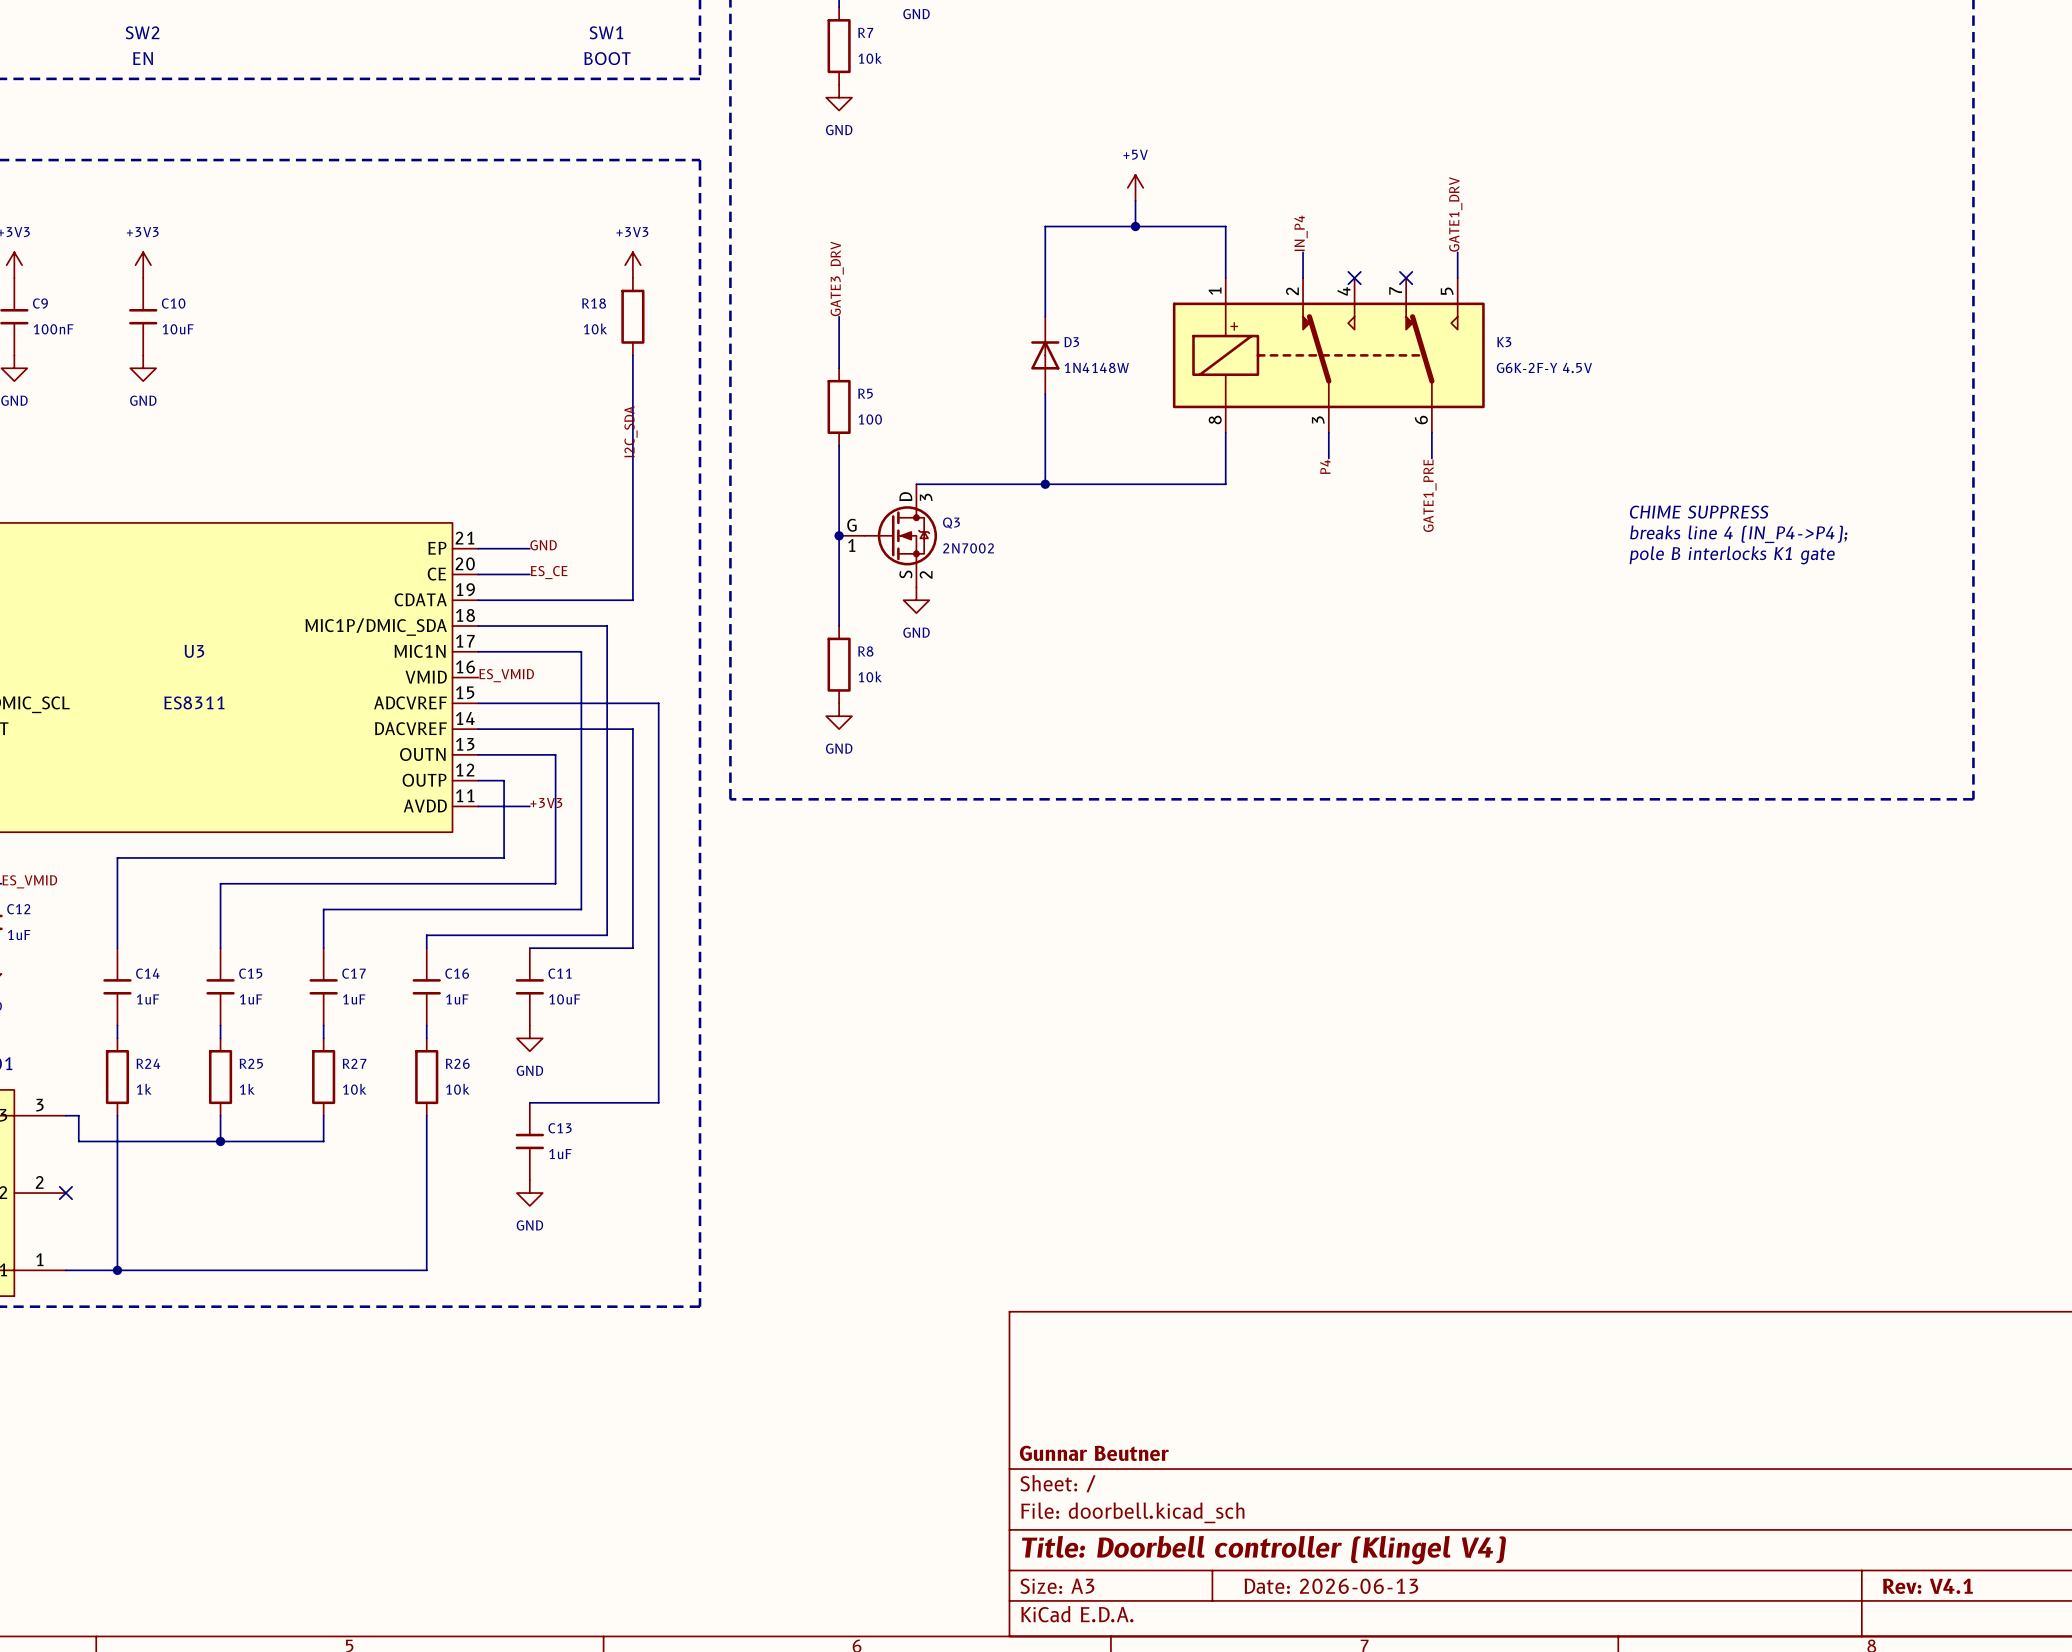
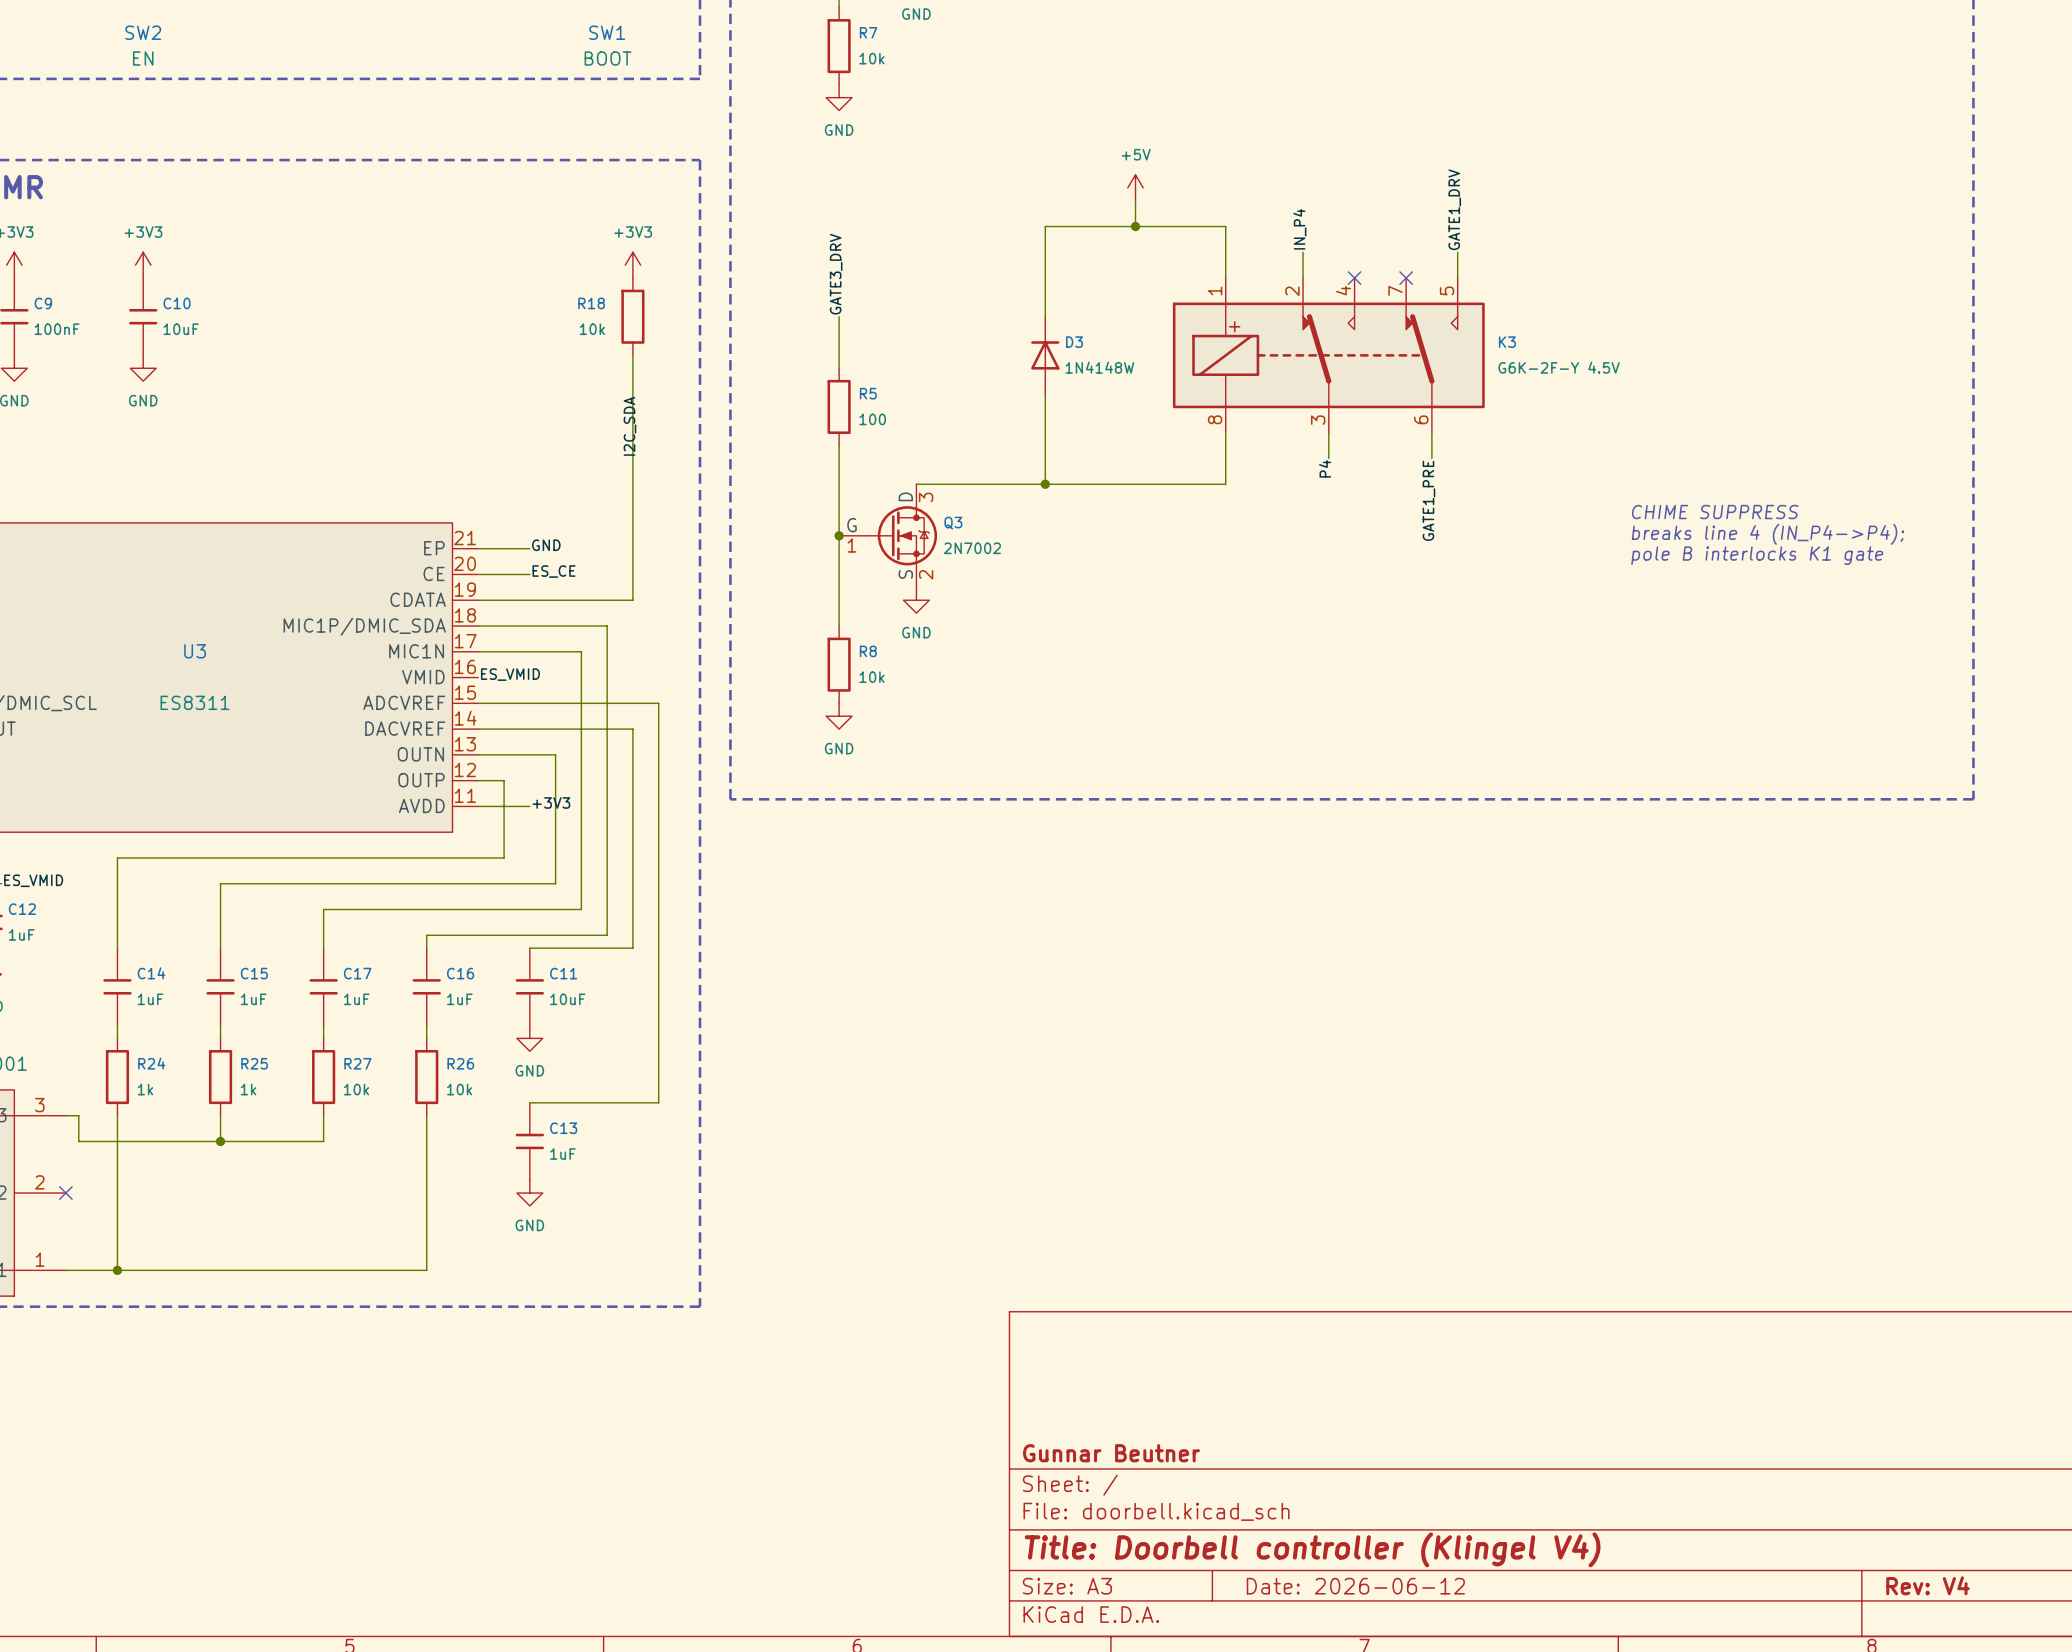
title block: Date: 2026-06-13 (1331, 1586) -> Date: 2026-06-12 (1355, 1586)
title block: Rev: V4.1 (1927, 1586) -> Rev: V4 (1927, 1585)

